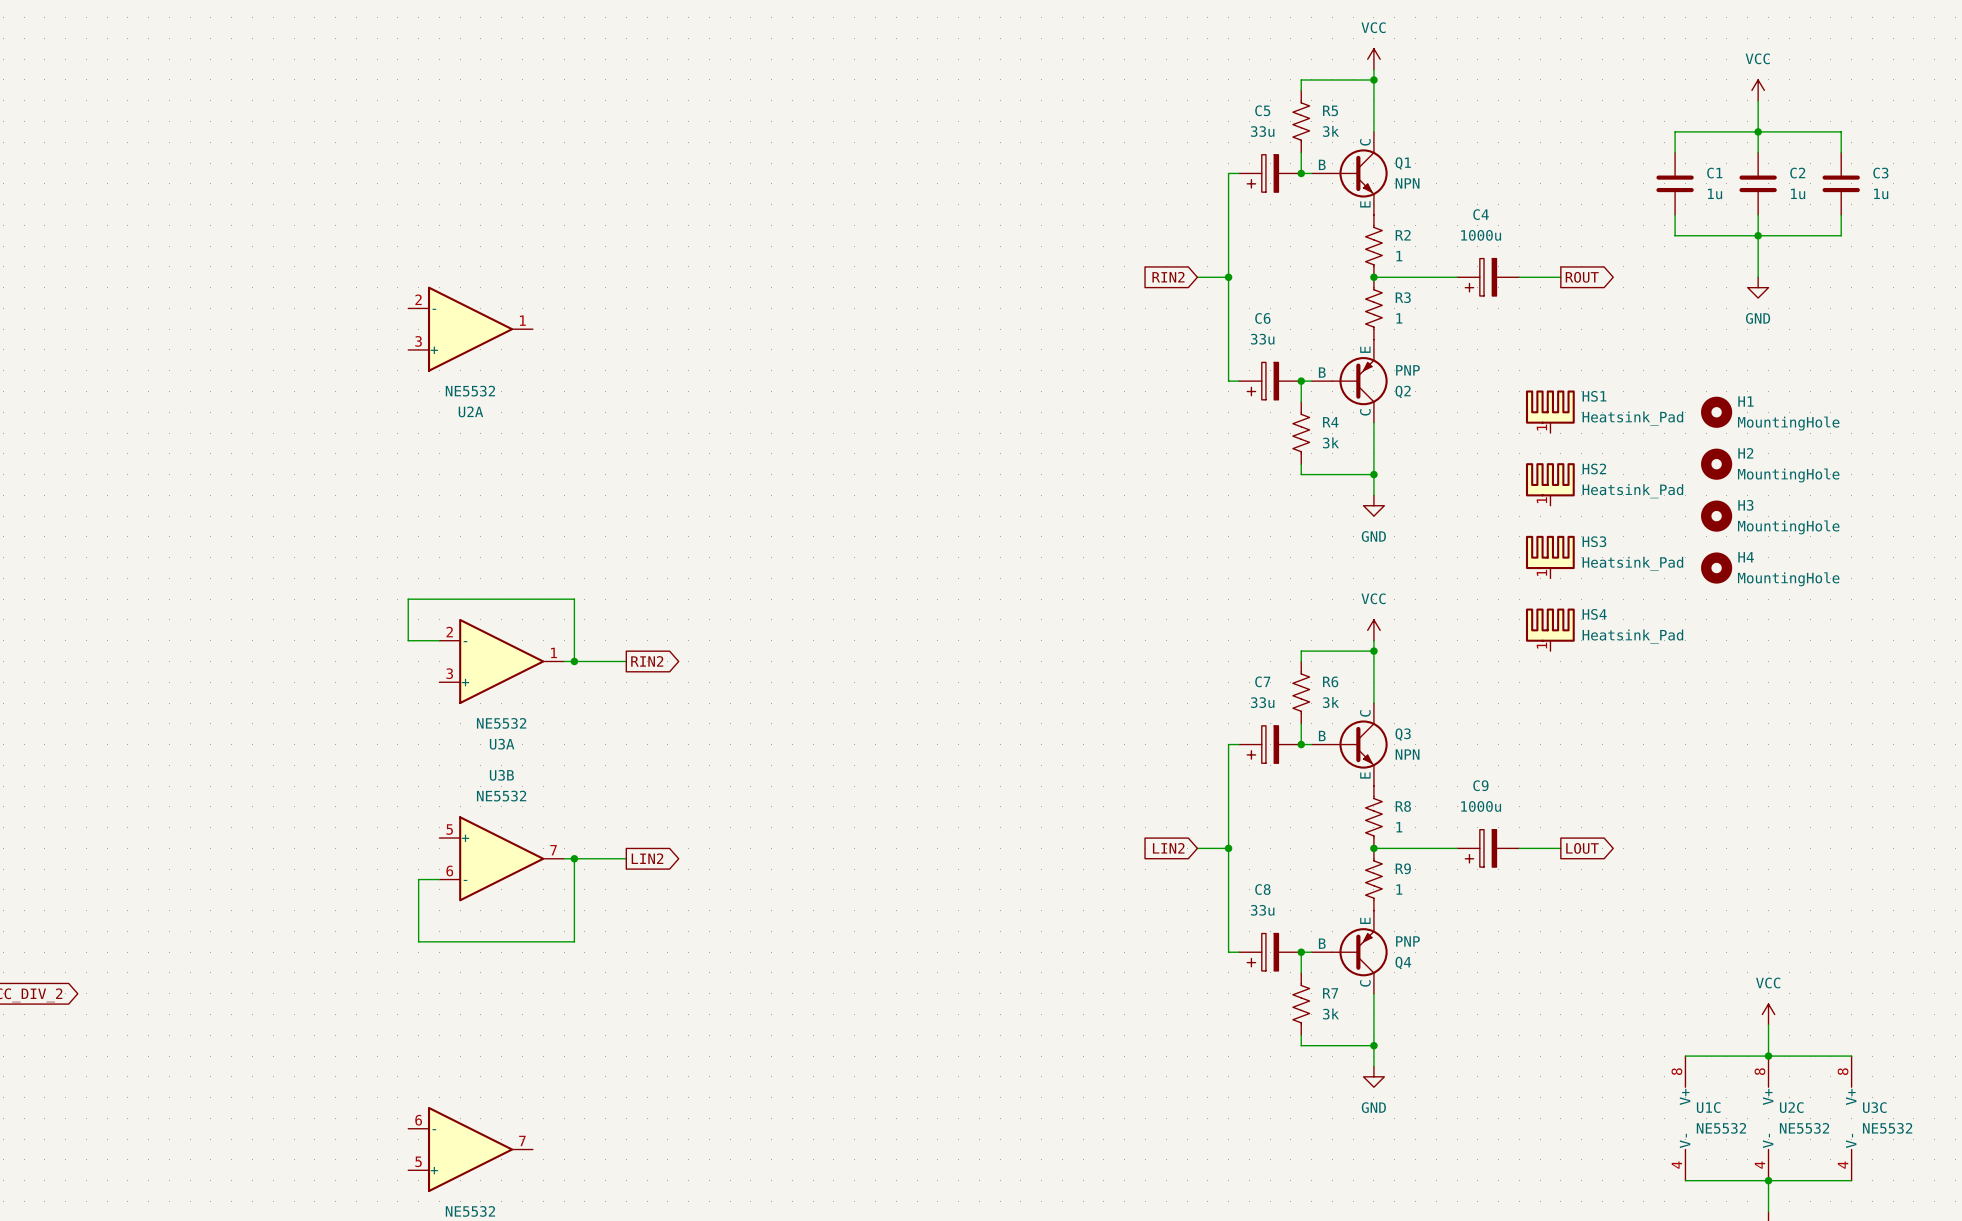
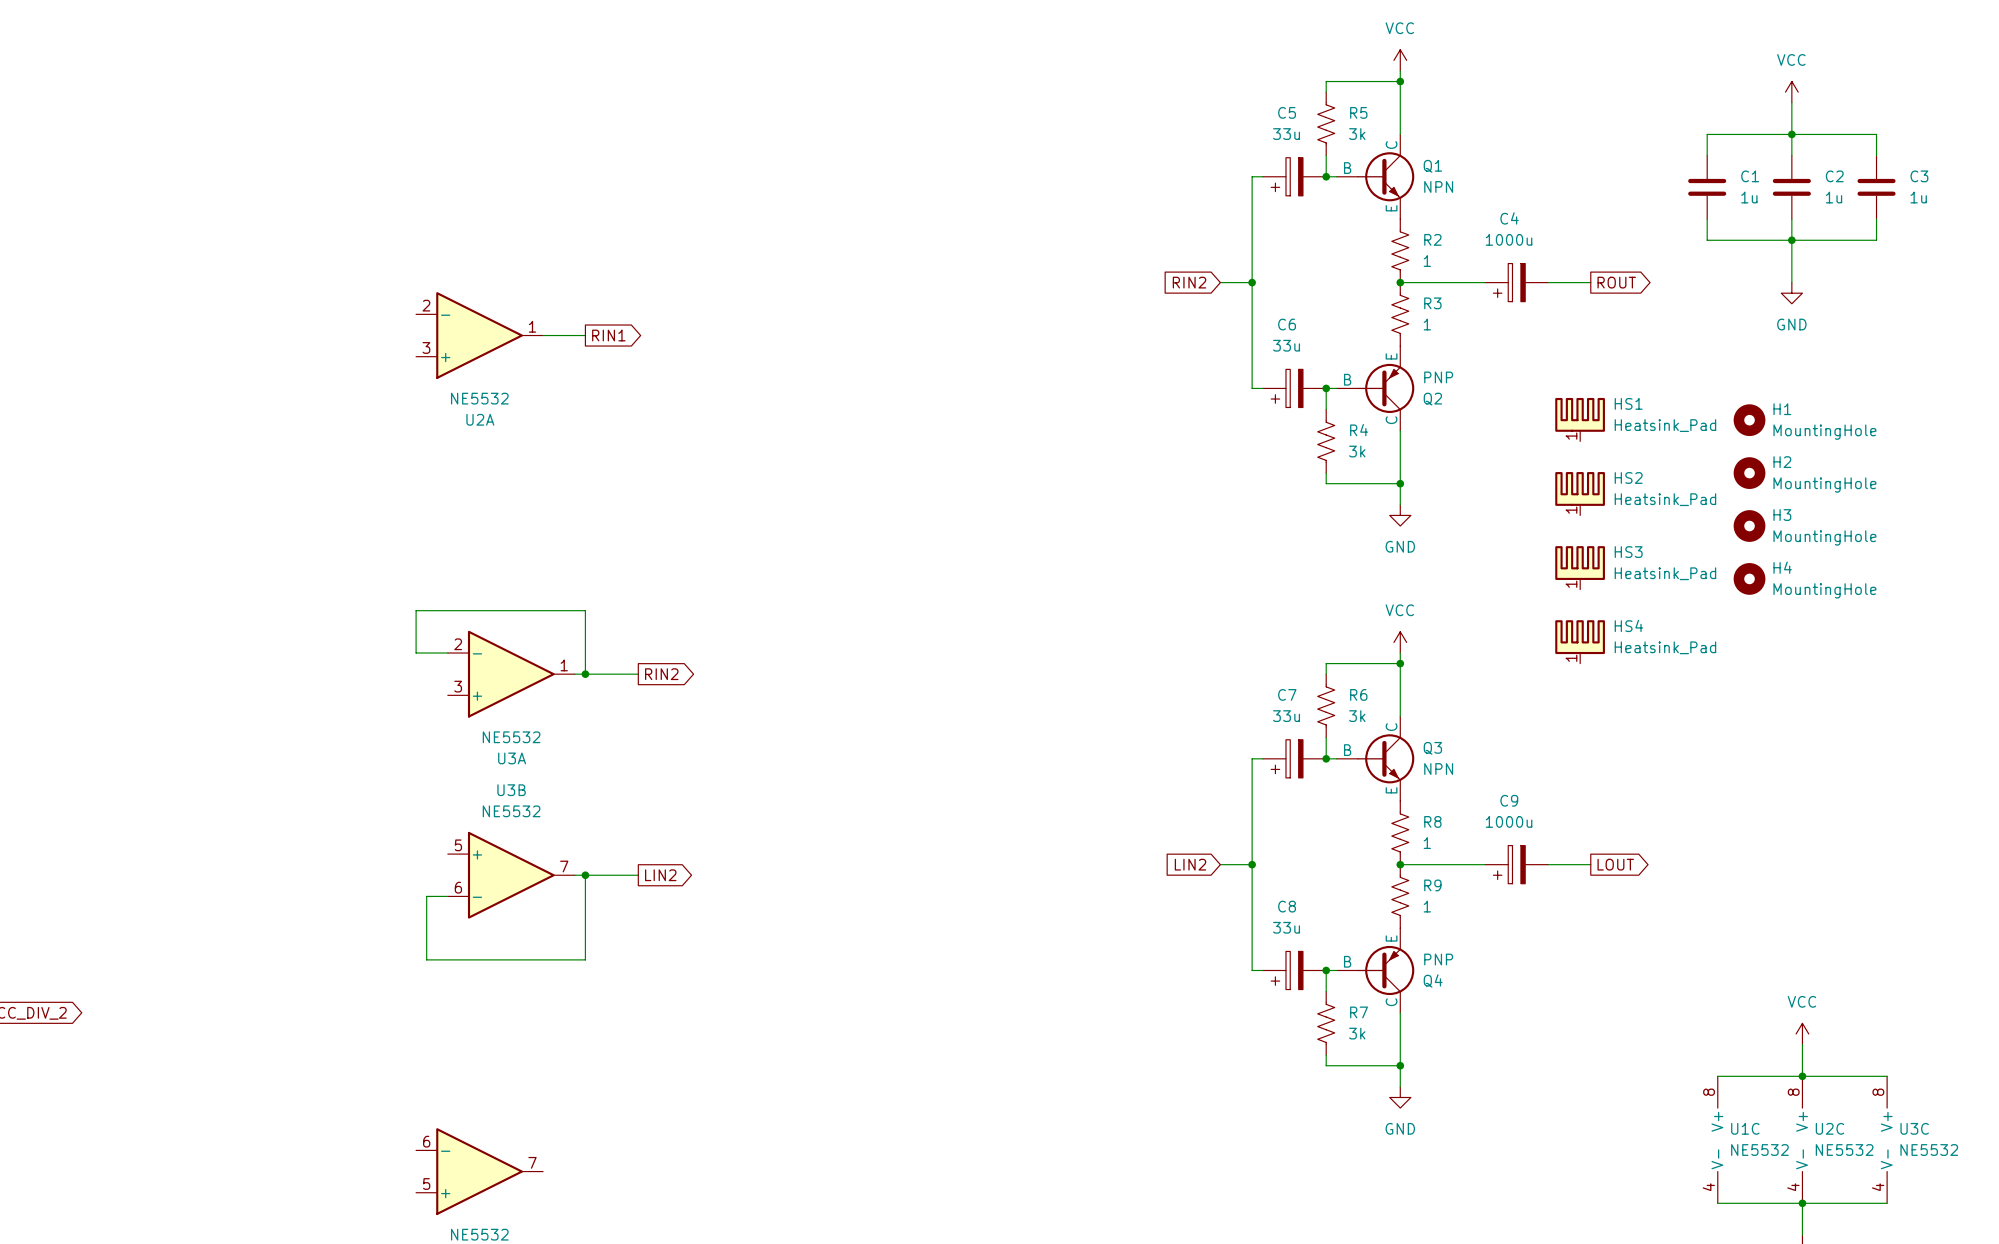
wire: none -> (543, 335) (585, 335)
global label: none -> RIN1 (608, 335)

